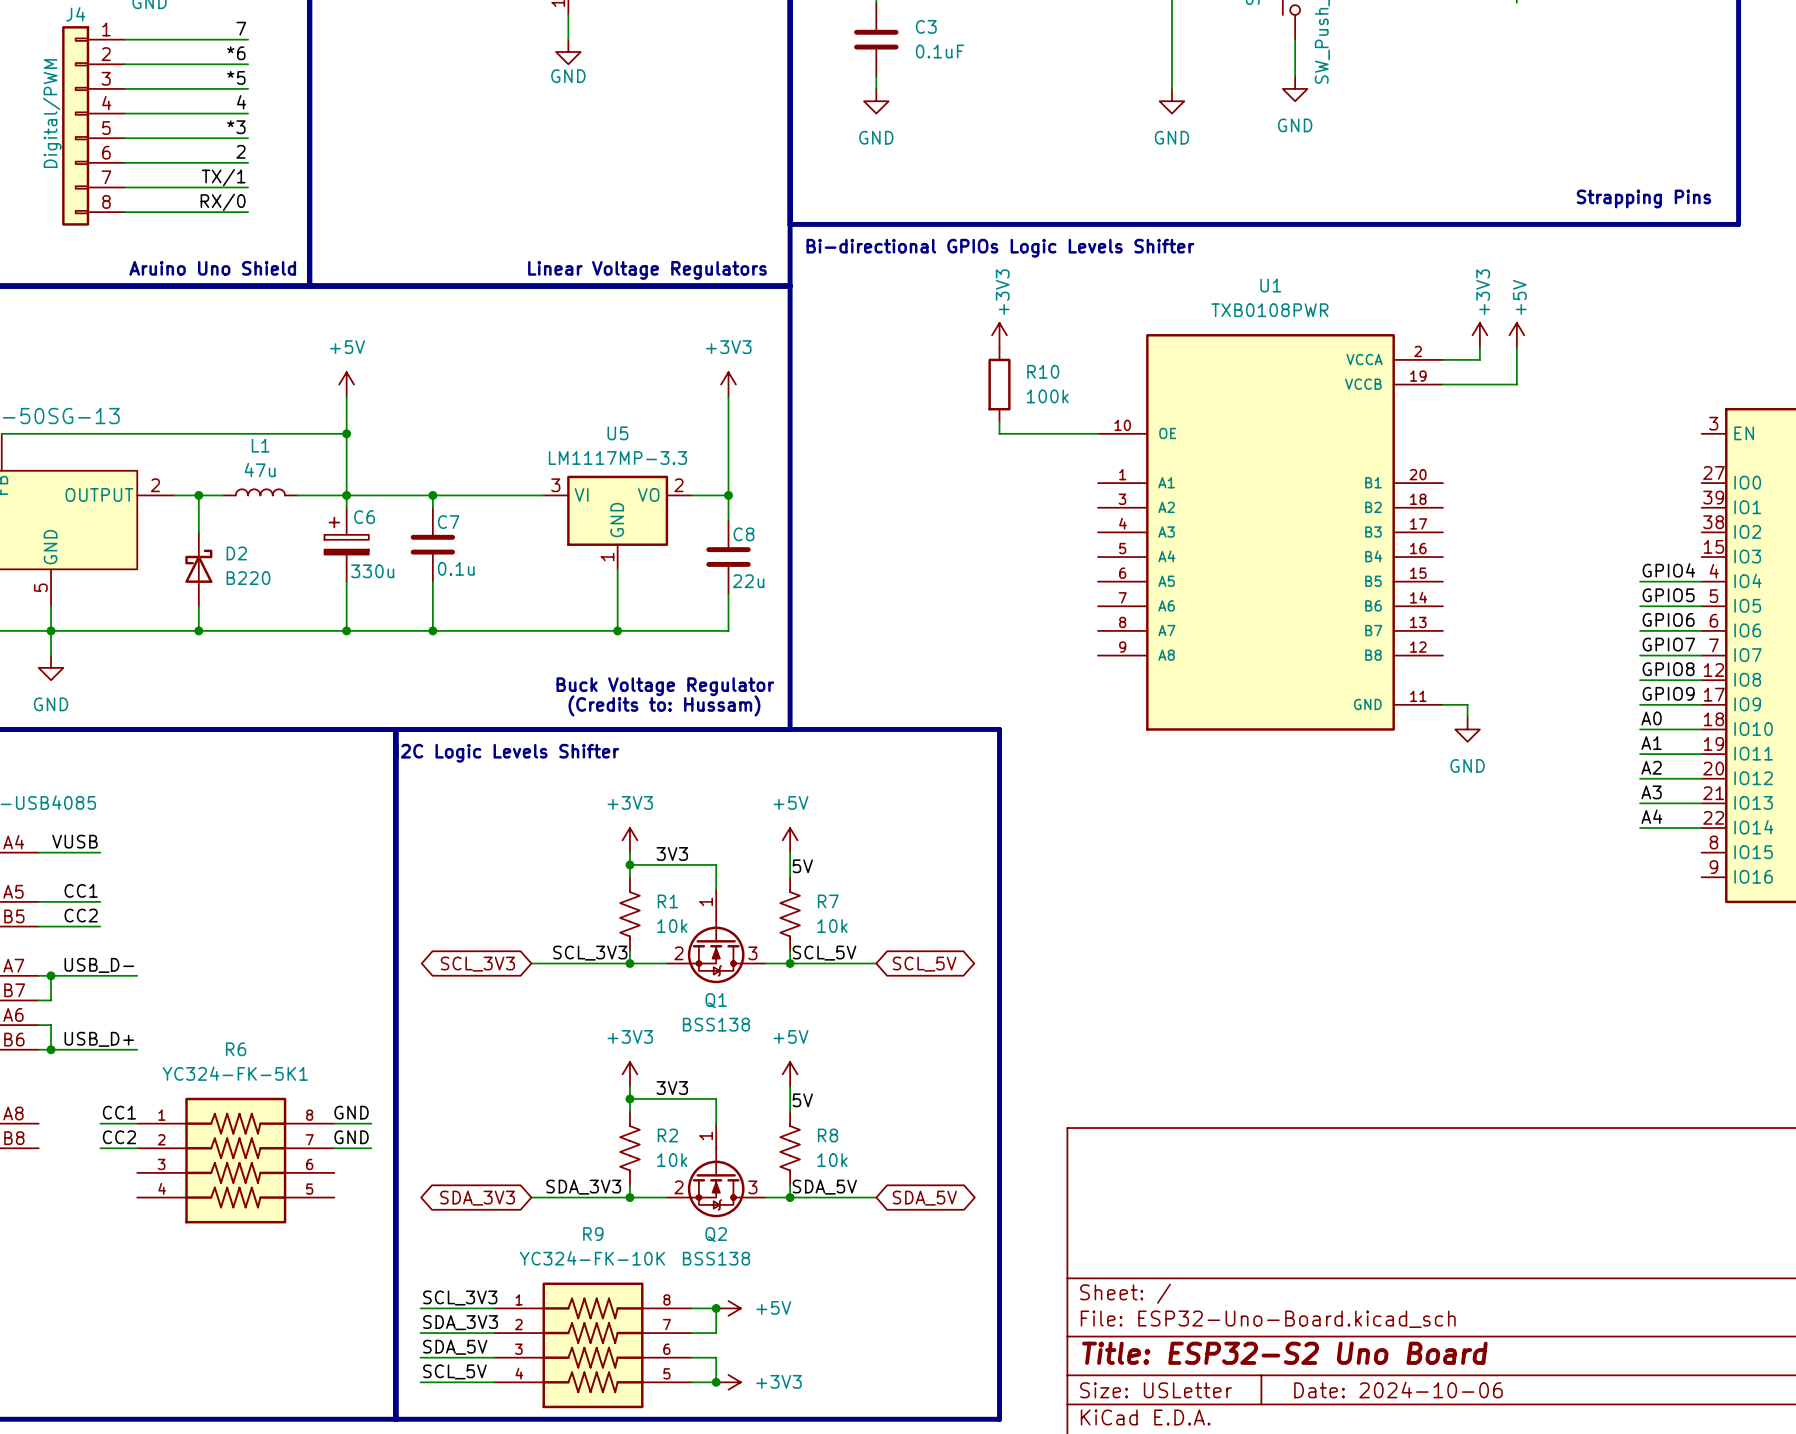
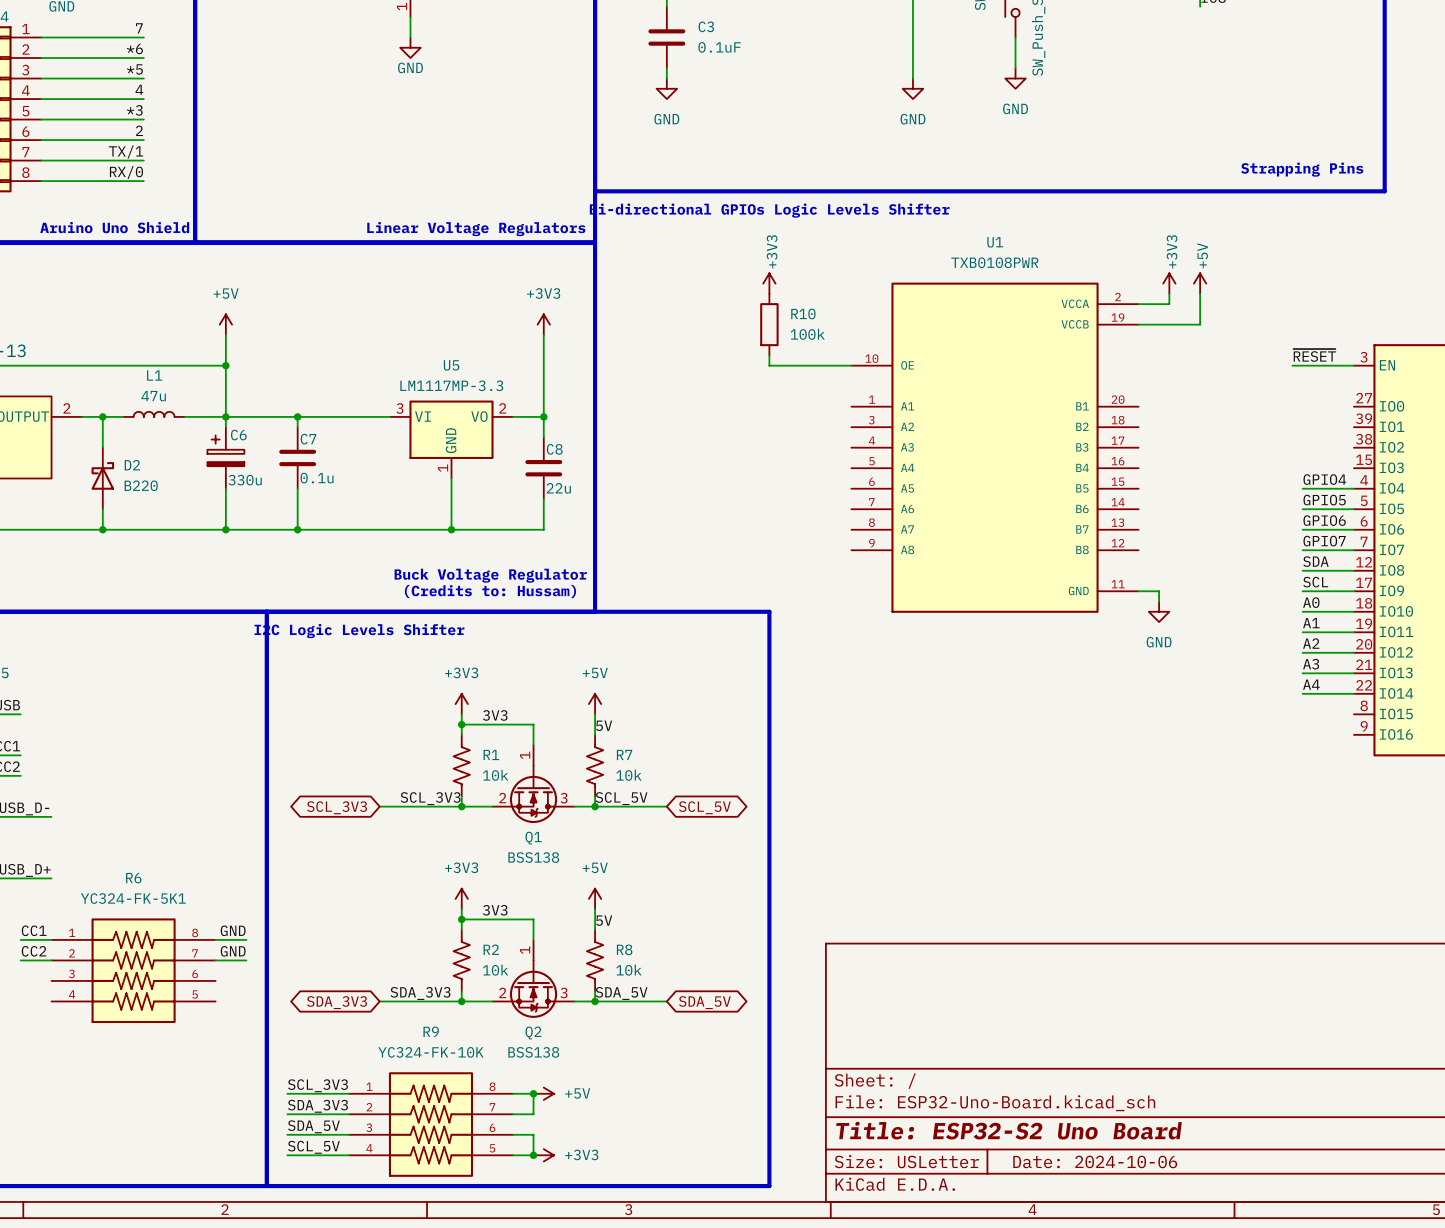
label: none -> ~{RESET} (1314, 355)
wire: none -> (1292, 365) (1353, 365)
label: GPIO8 (1668, 669) -> SDA (1315, 561)
label: GPIO9 (1668, 693) -> SCL (1315, 582)

